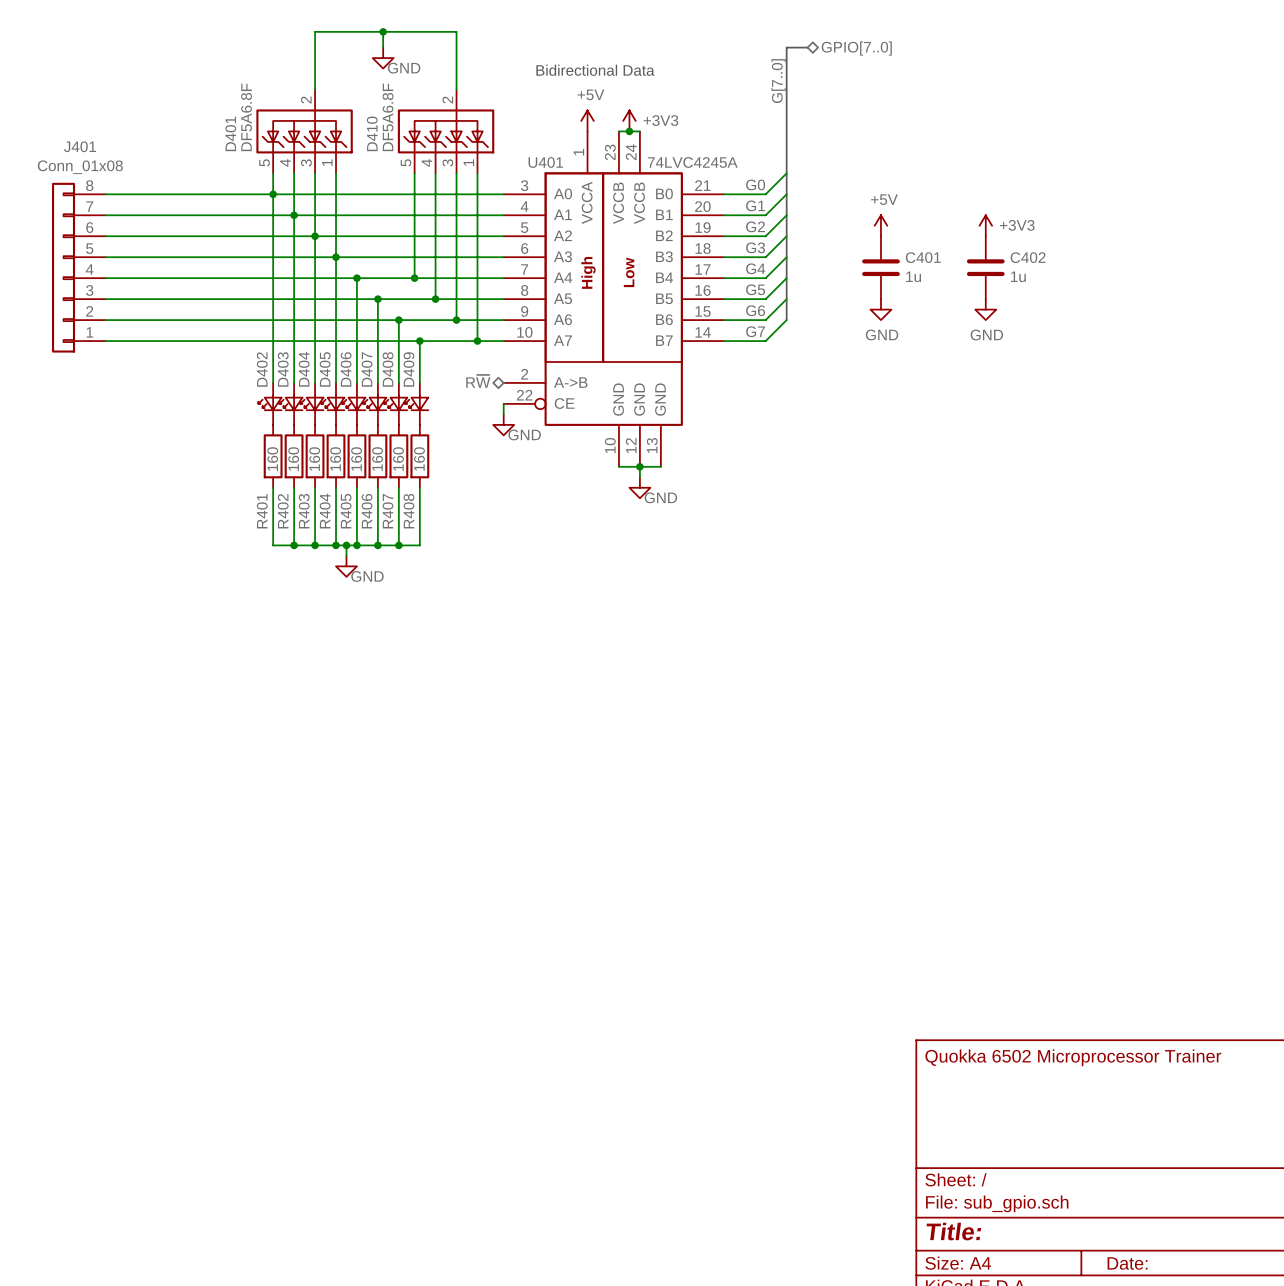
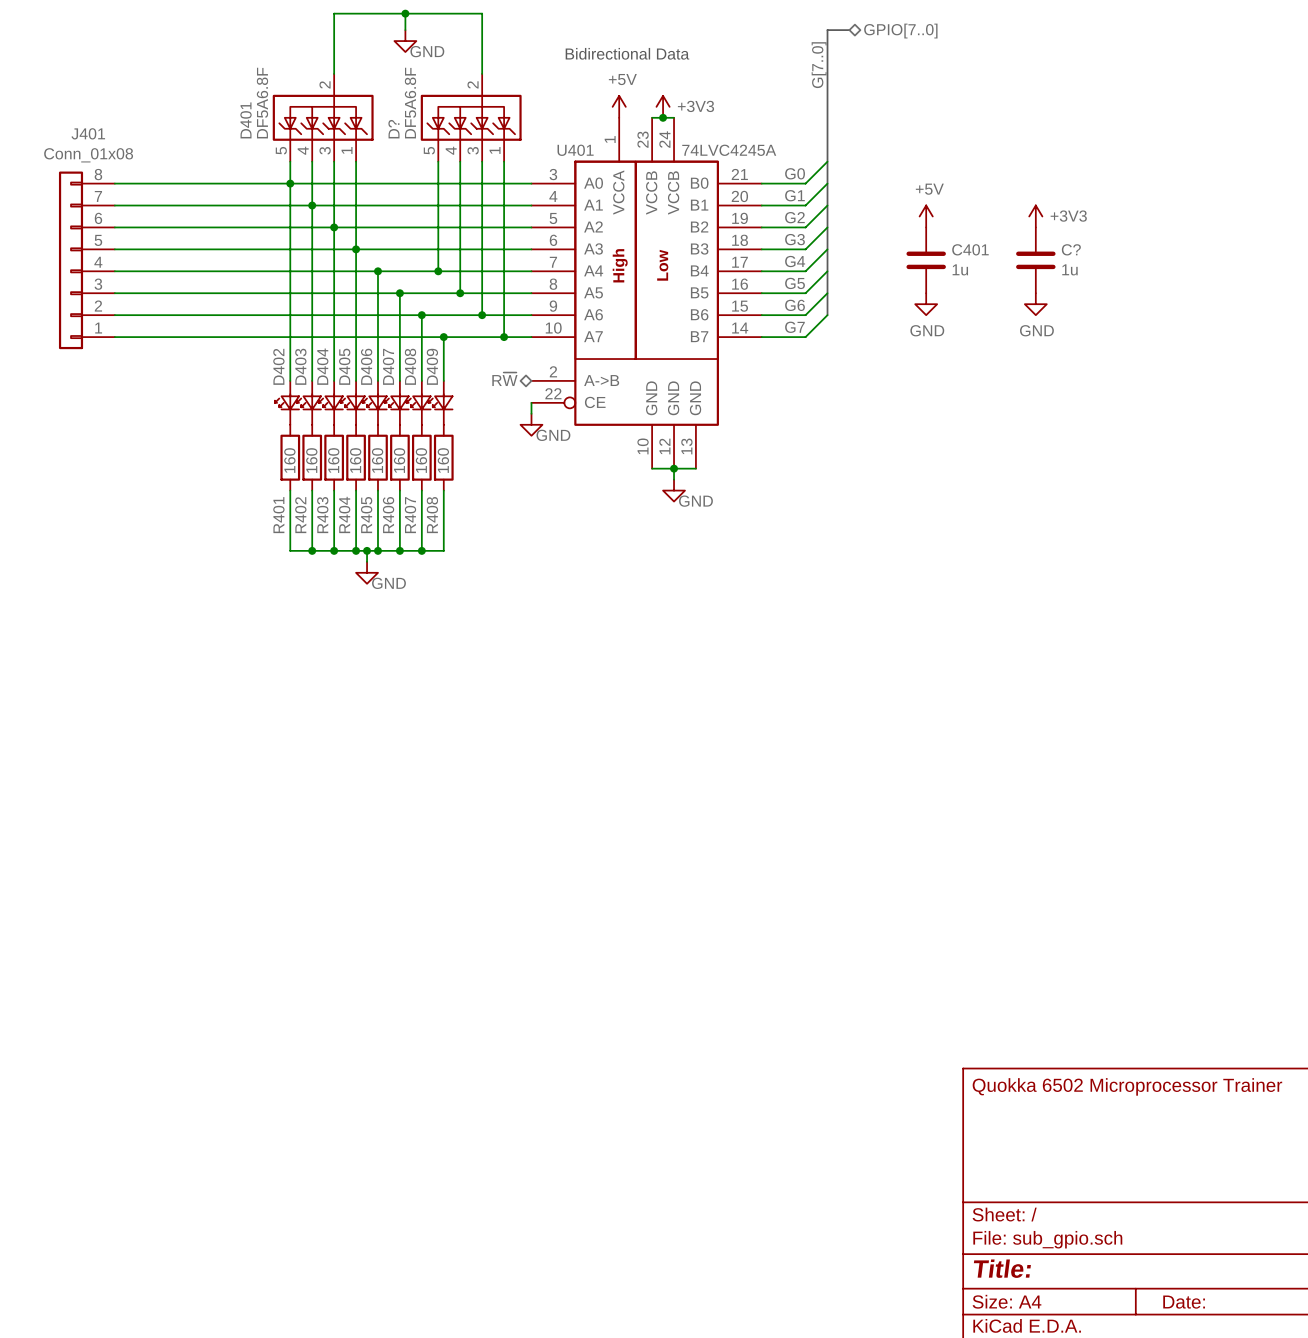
D410 name: D410 (372, 133) -> D? (393, 129)
C402 name: C402 (1028, 257) -> C? (1071, 249)

